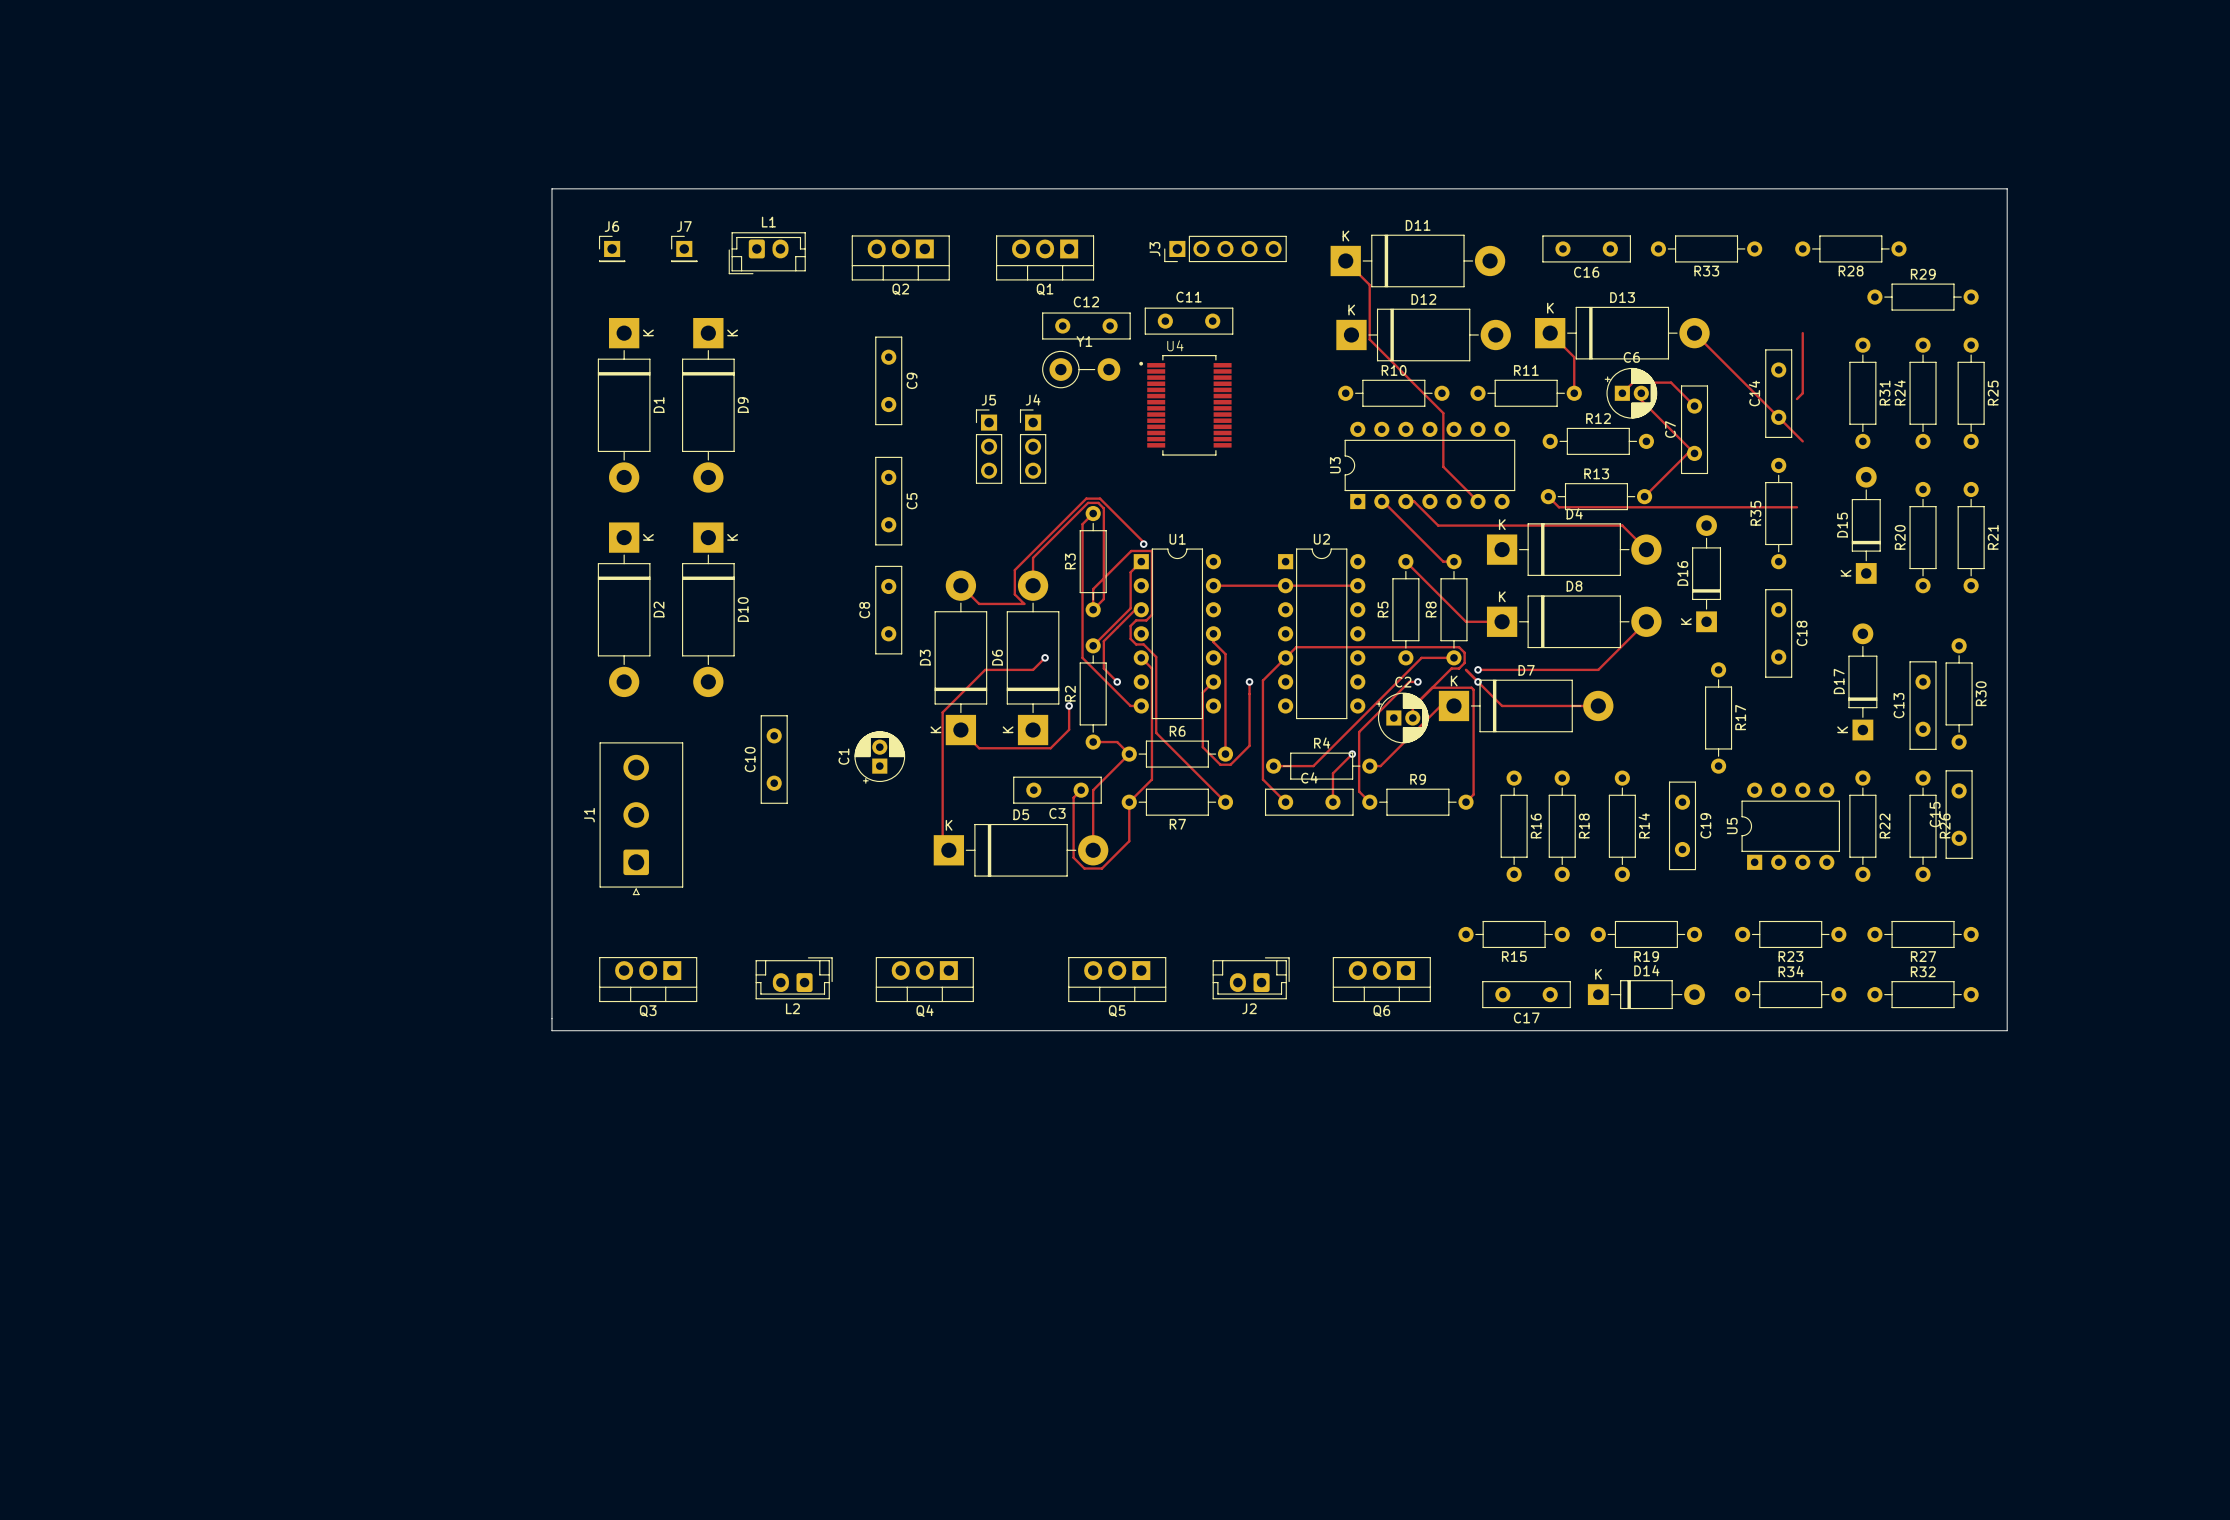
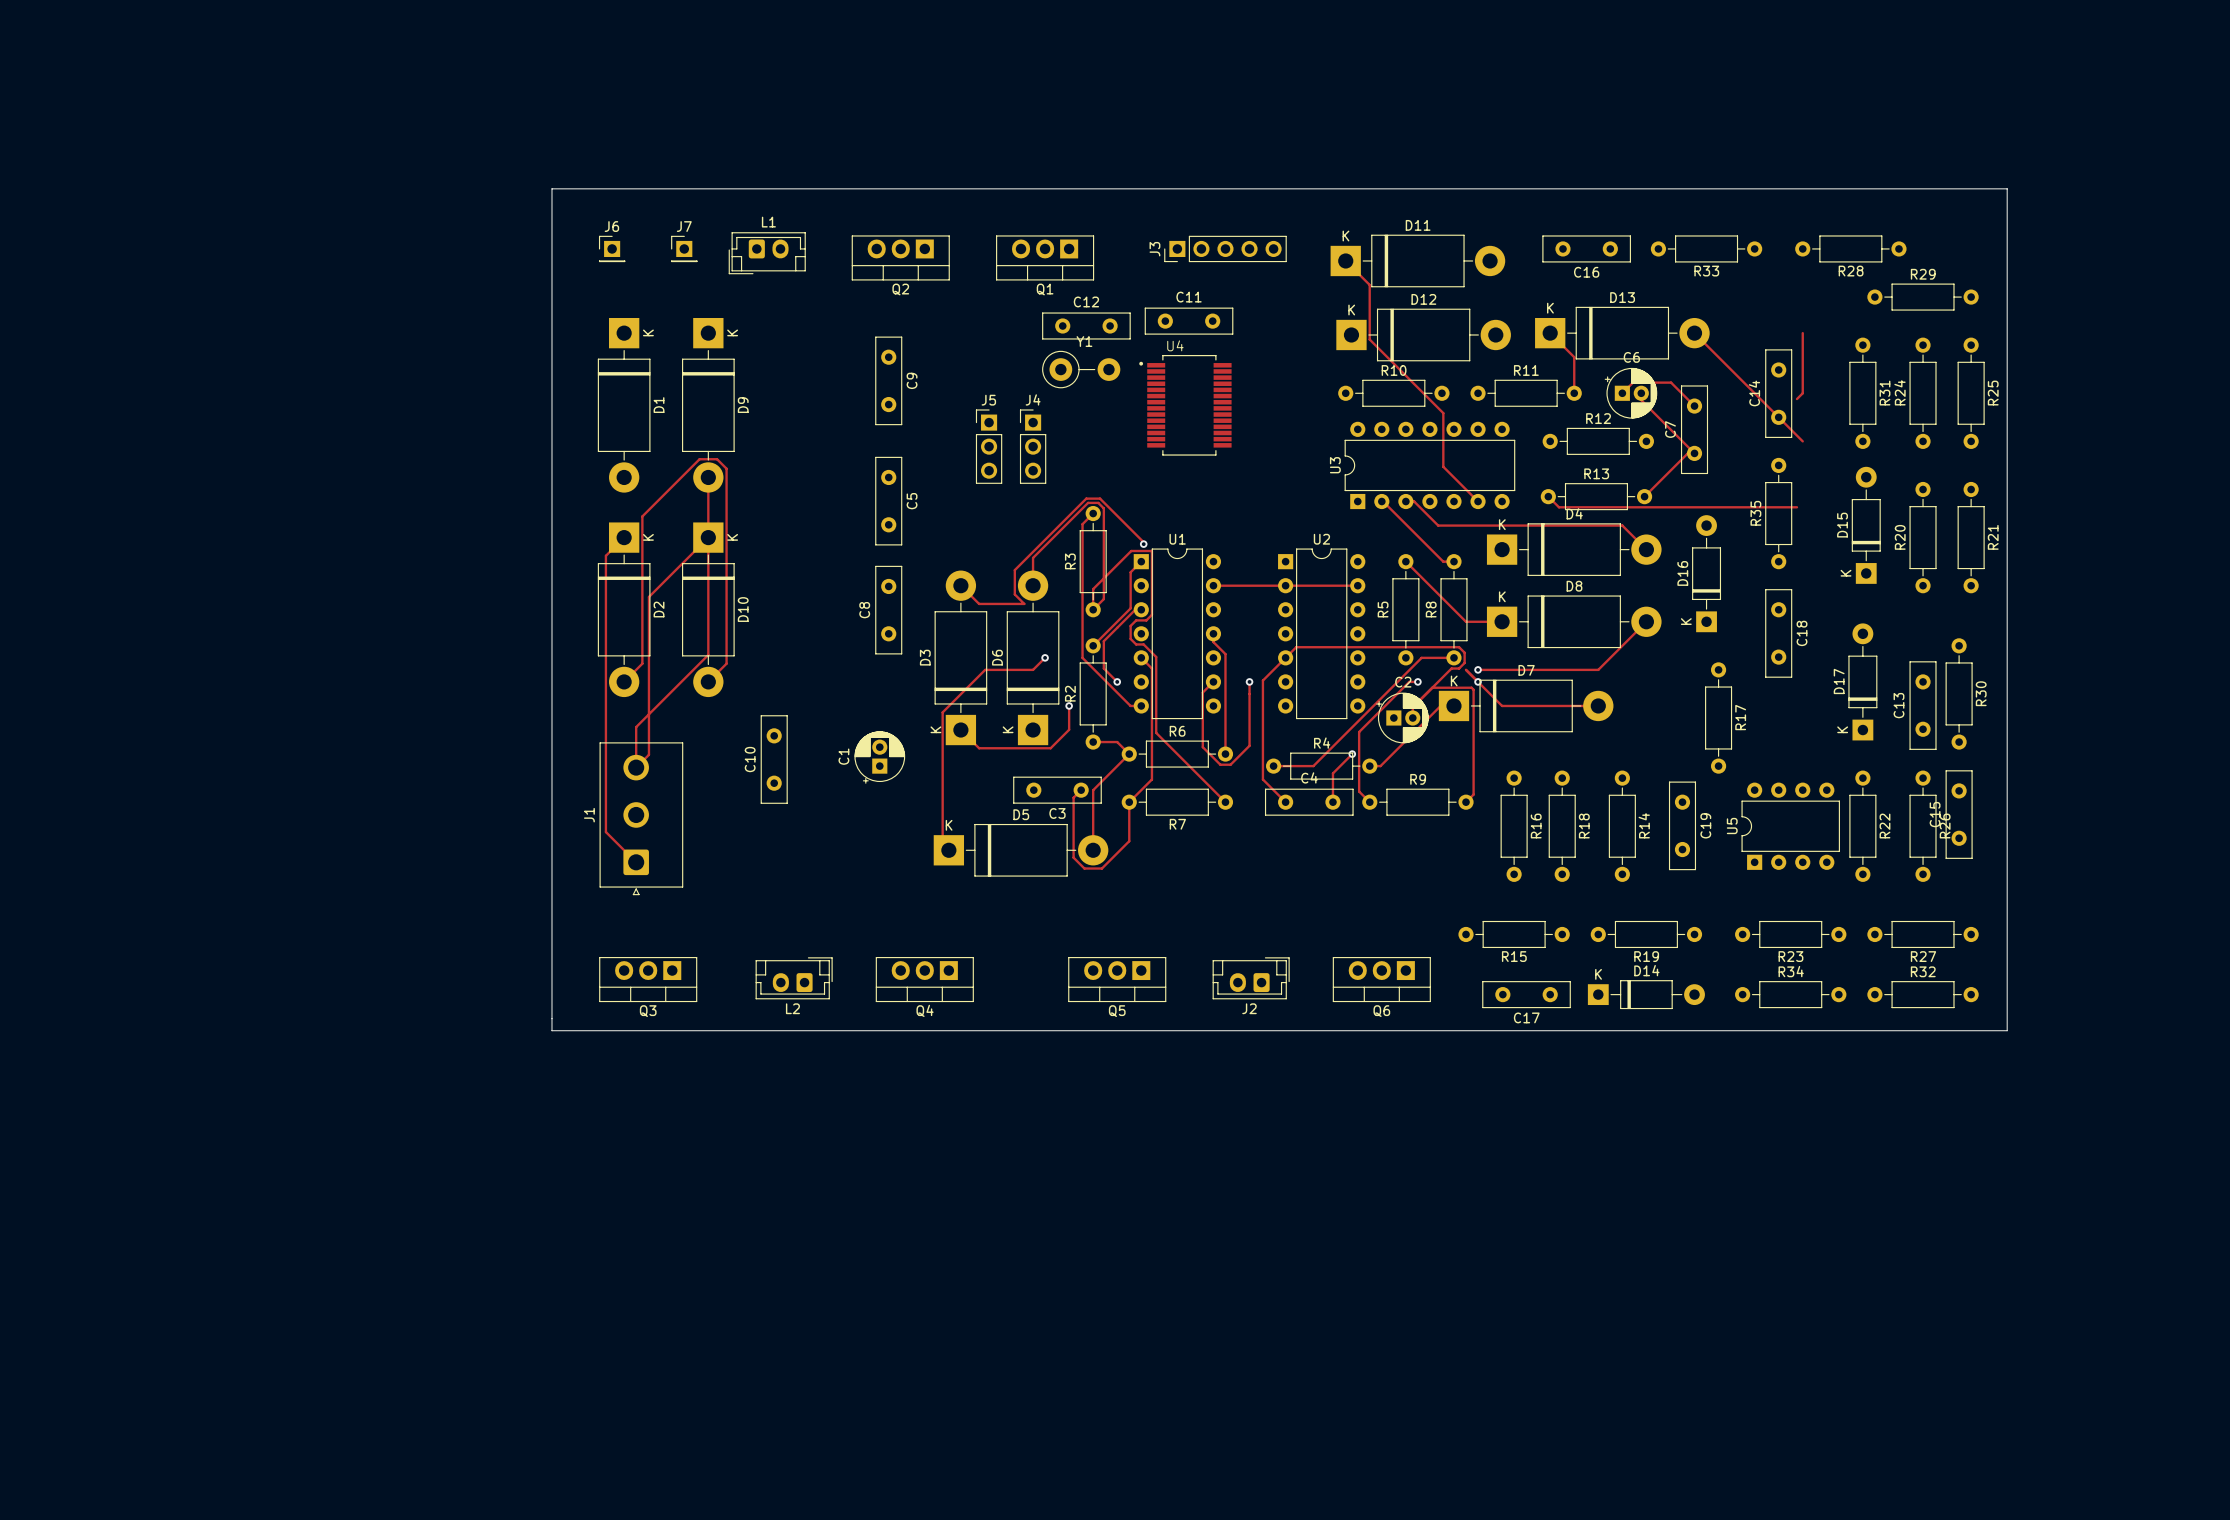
track: none -> (708, 477) (708, 654) (636, 727) (636, 767) (648, 754) (648, 596) (708, 537)
track: none -> (624, 537) (605, 555) (605, 832) (636, 862)
track: none -> (624, 681) (642, 663) (642, 516) (699, 459) (717, 459) (726, 468) (726, 663) (708, 681)

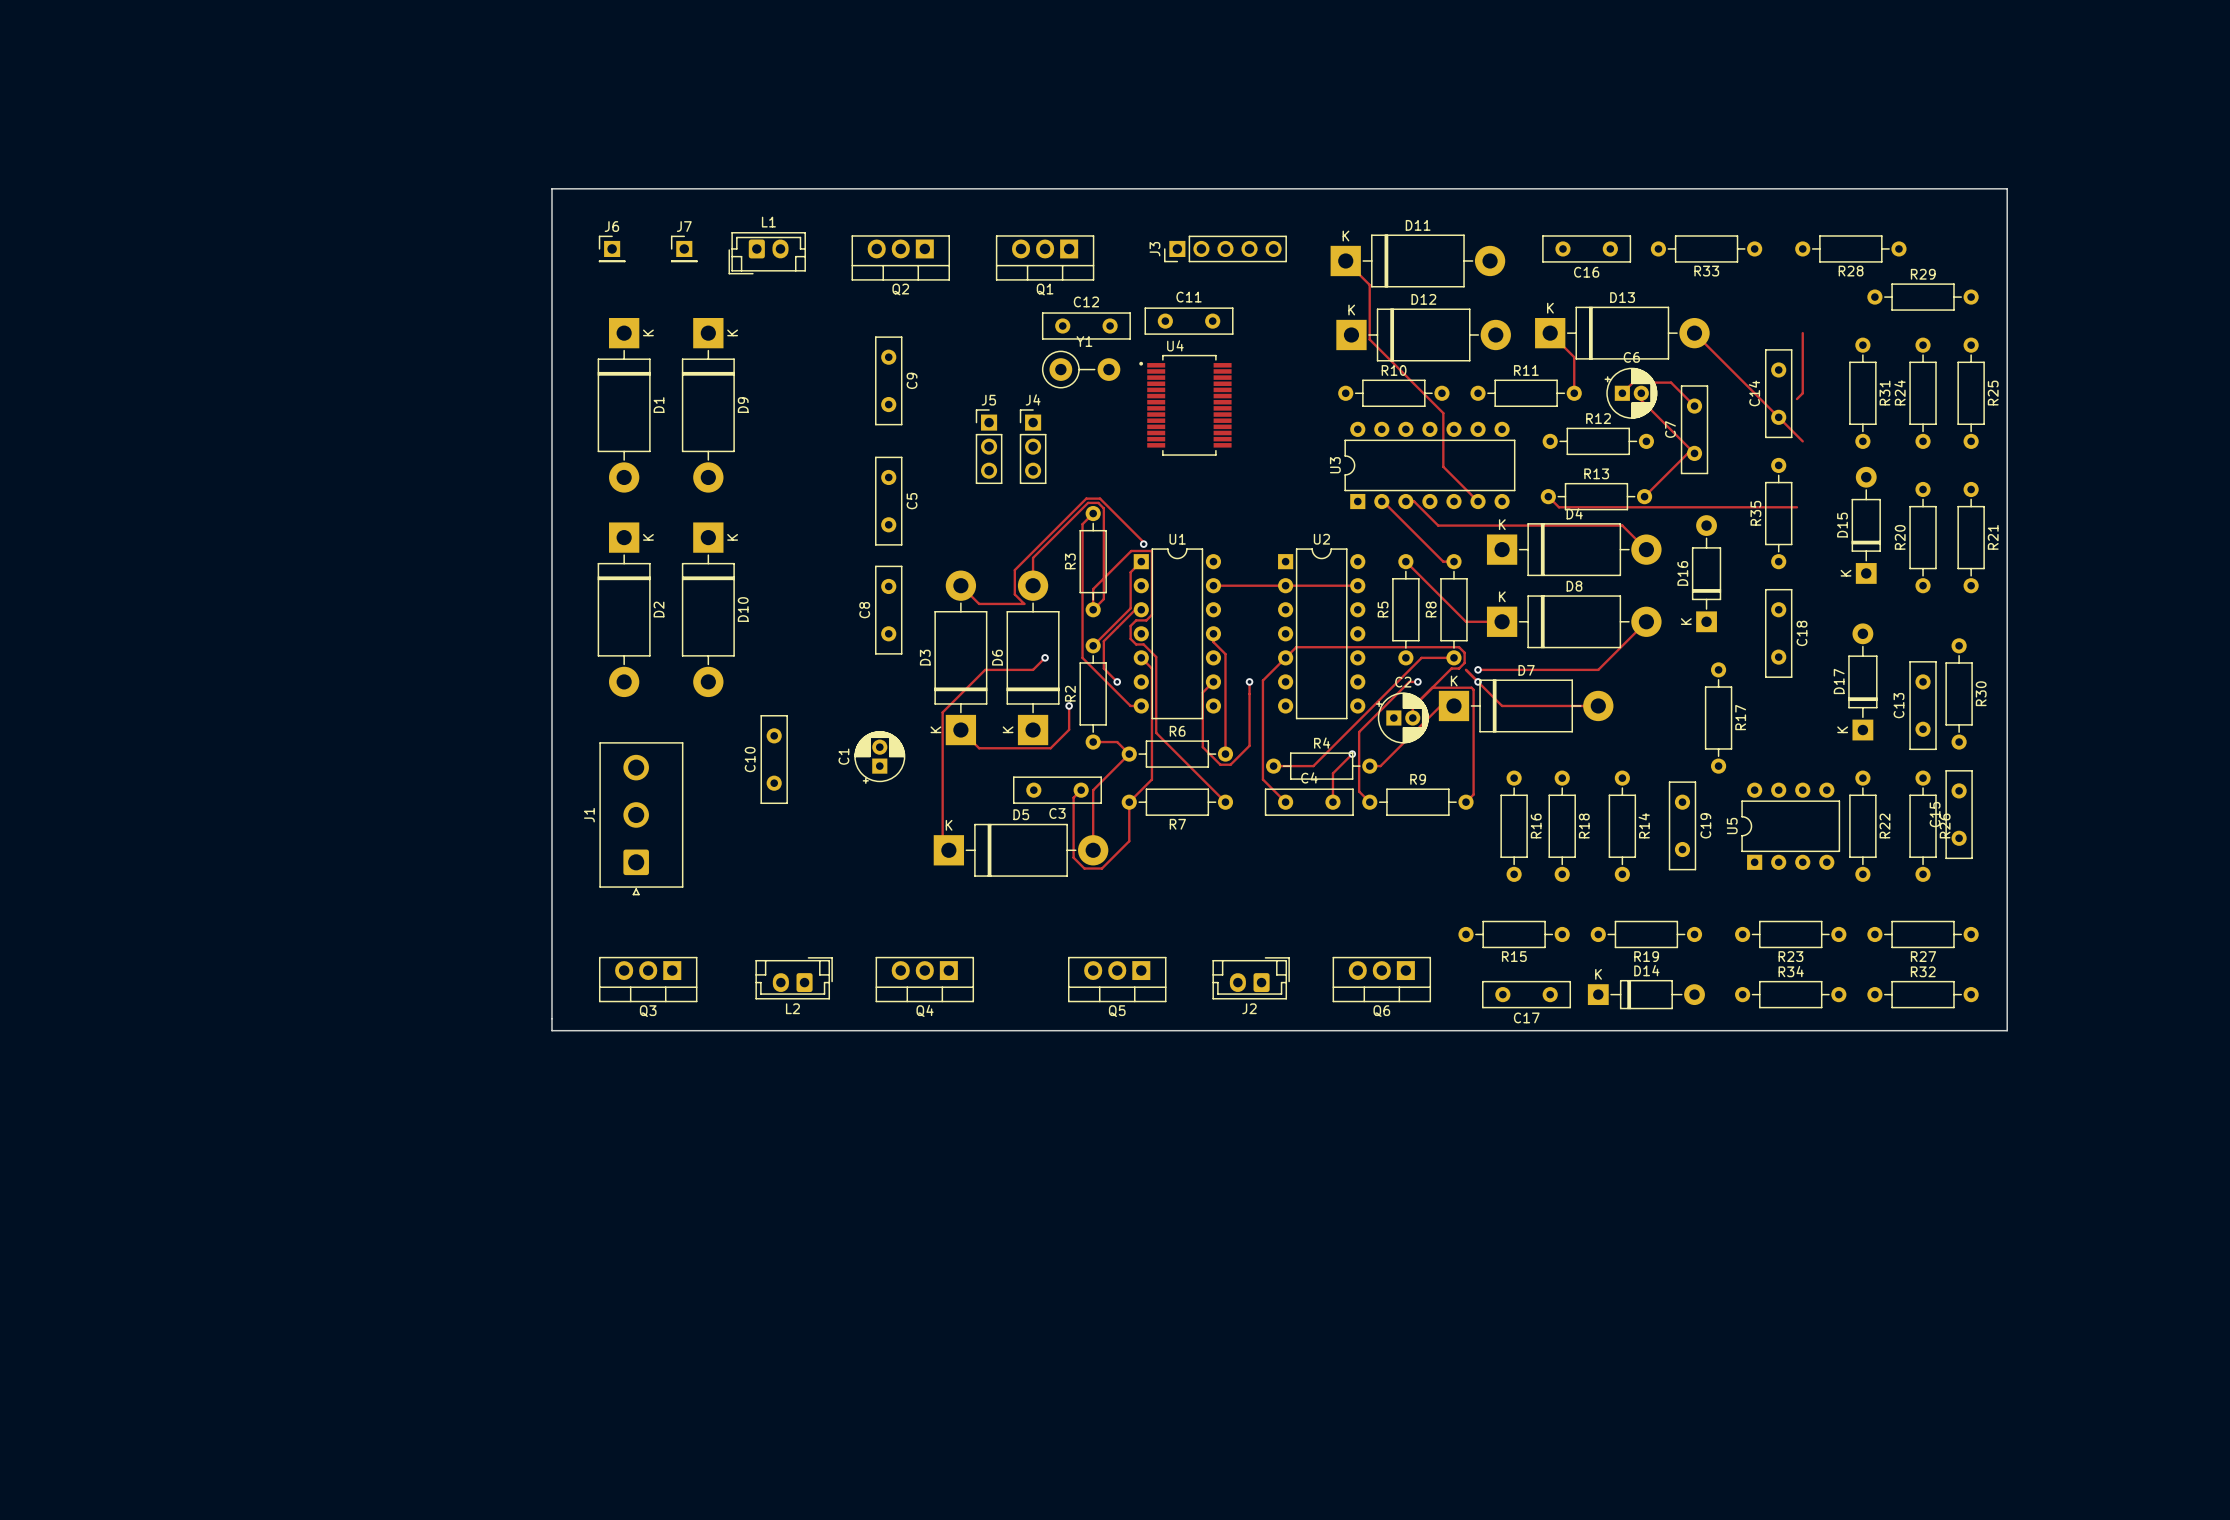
track: (708, 477) (708, 654) (636, 727) (636, 767) (648, 754) (648, 596) (708, 537) -> none
track: (624, 537) (605, 555) (605, 832) (636, 862) -> none
track: (624, 681) (642, 663) (642, 516) (699, 459) (717, 459) (726, 468) (726, 663) (708, 681) -> none

